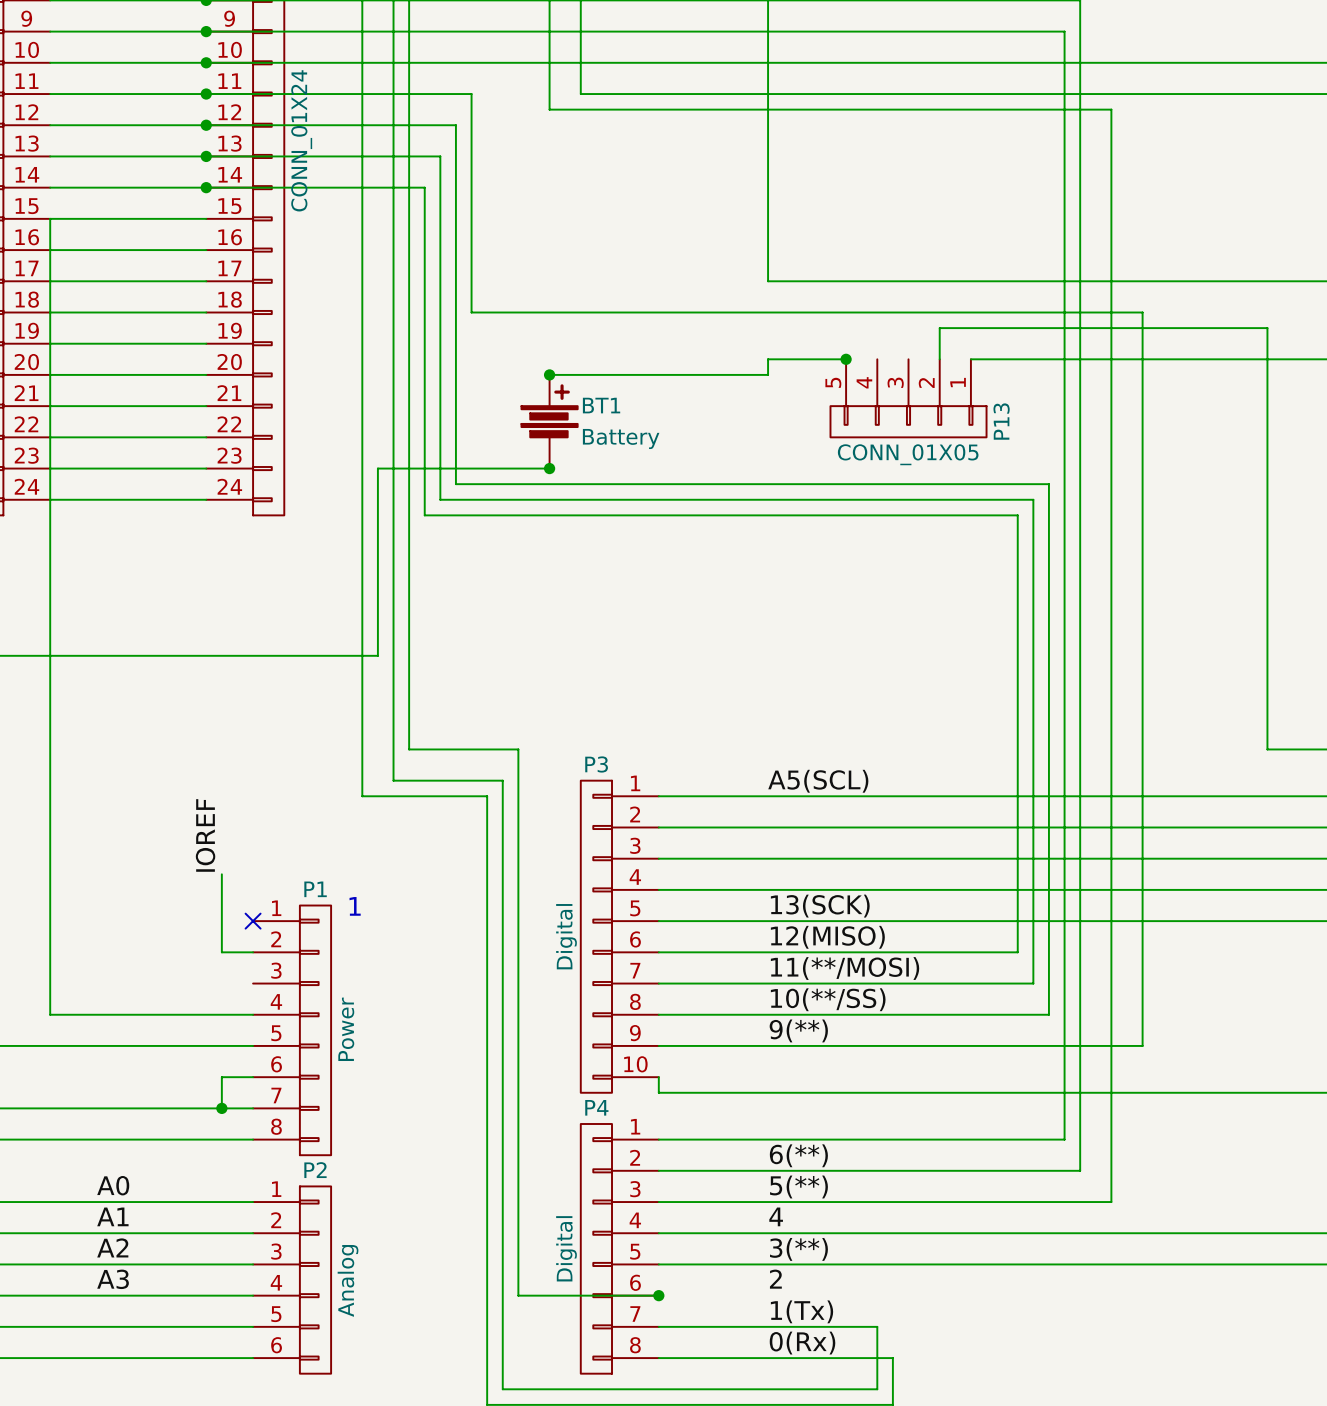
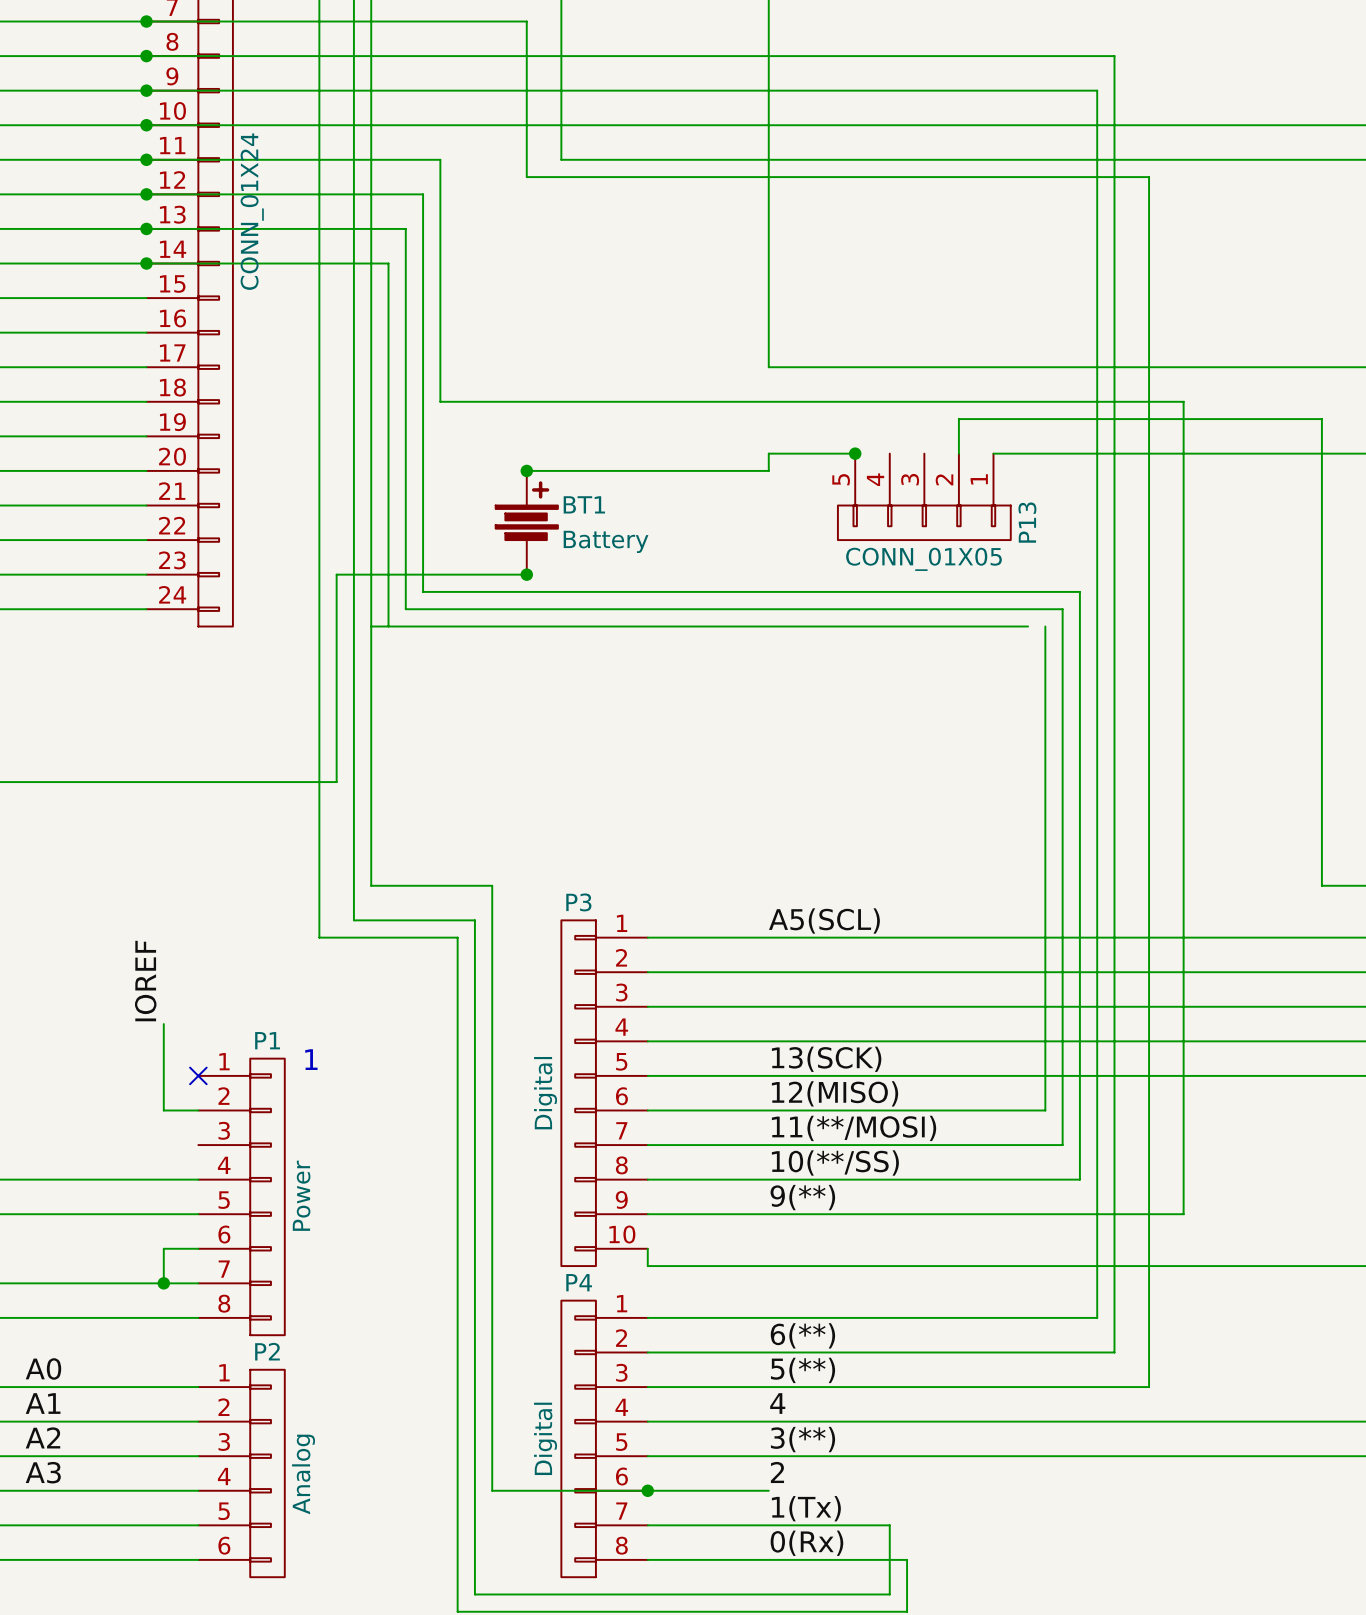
wire: none -> (371, 626) (388, 626)
wire: (1002, 515) (1017, 515) -> none
wire: none -> (647, 1490) (768, 1490)

